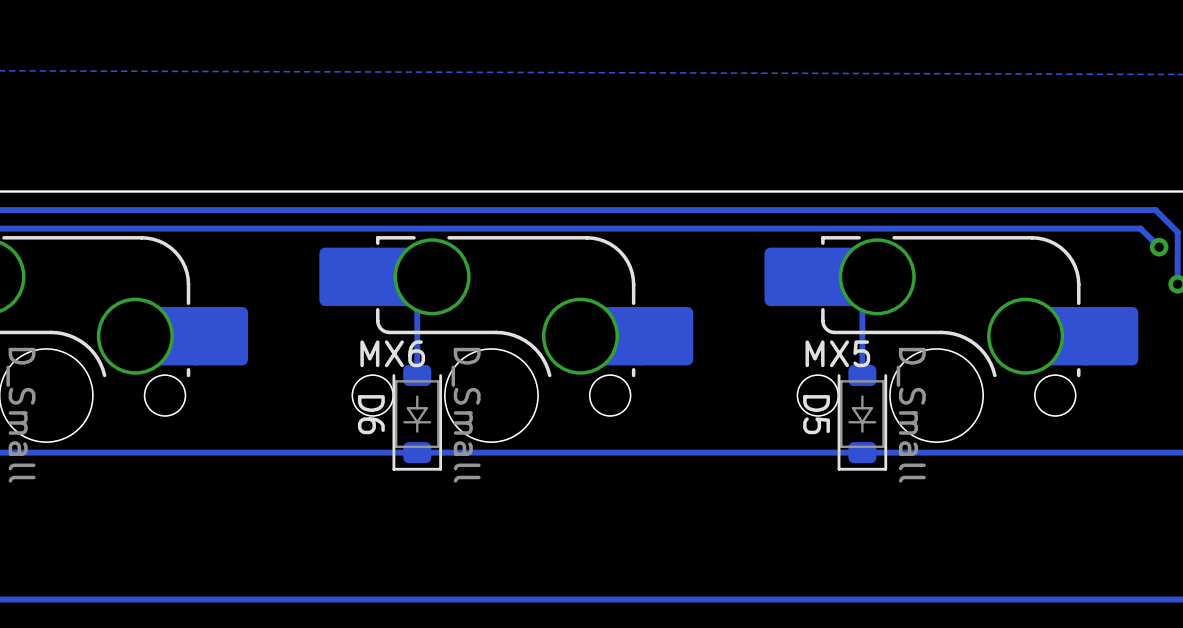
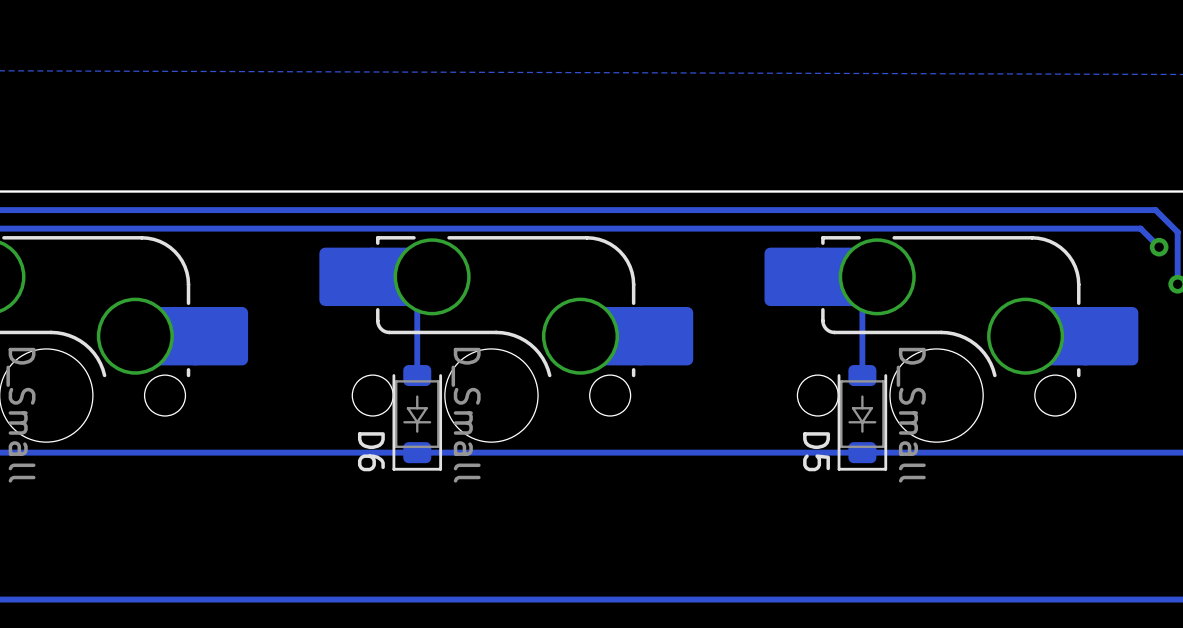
MX6 name: MX6 (392, 353) -> none
MX5 name: MX5 (837, 353) -> none
D6 name position: D6 (371, 414) -> D6 (371, 451)
D5 name position: D5 (816, 414) -> D5 (816, 451)

